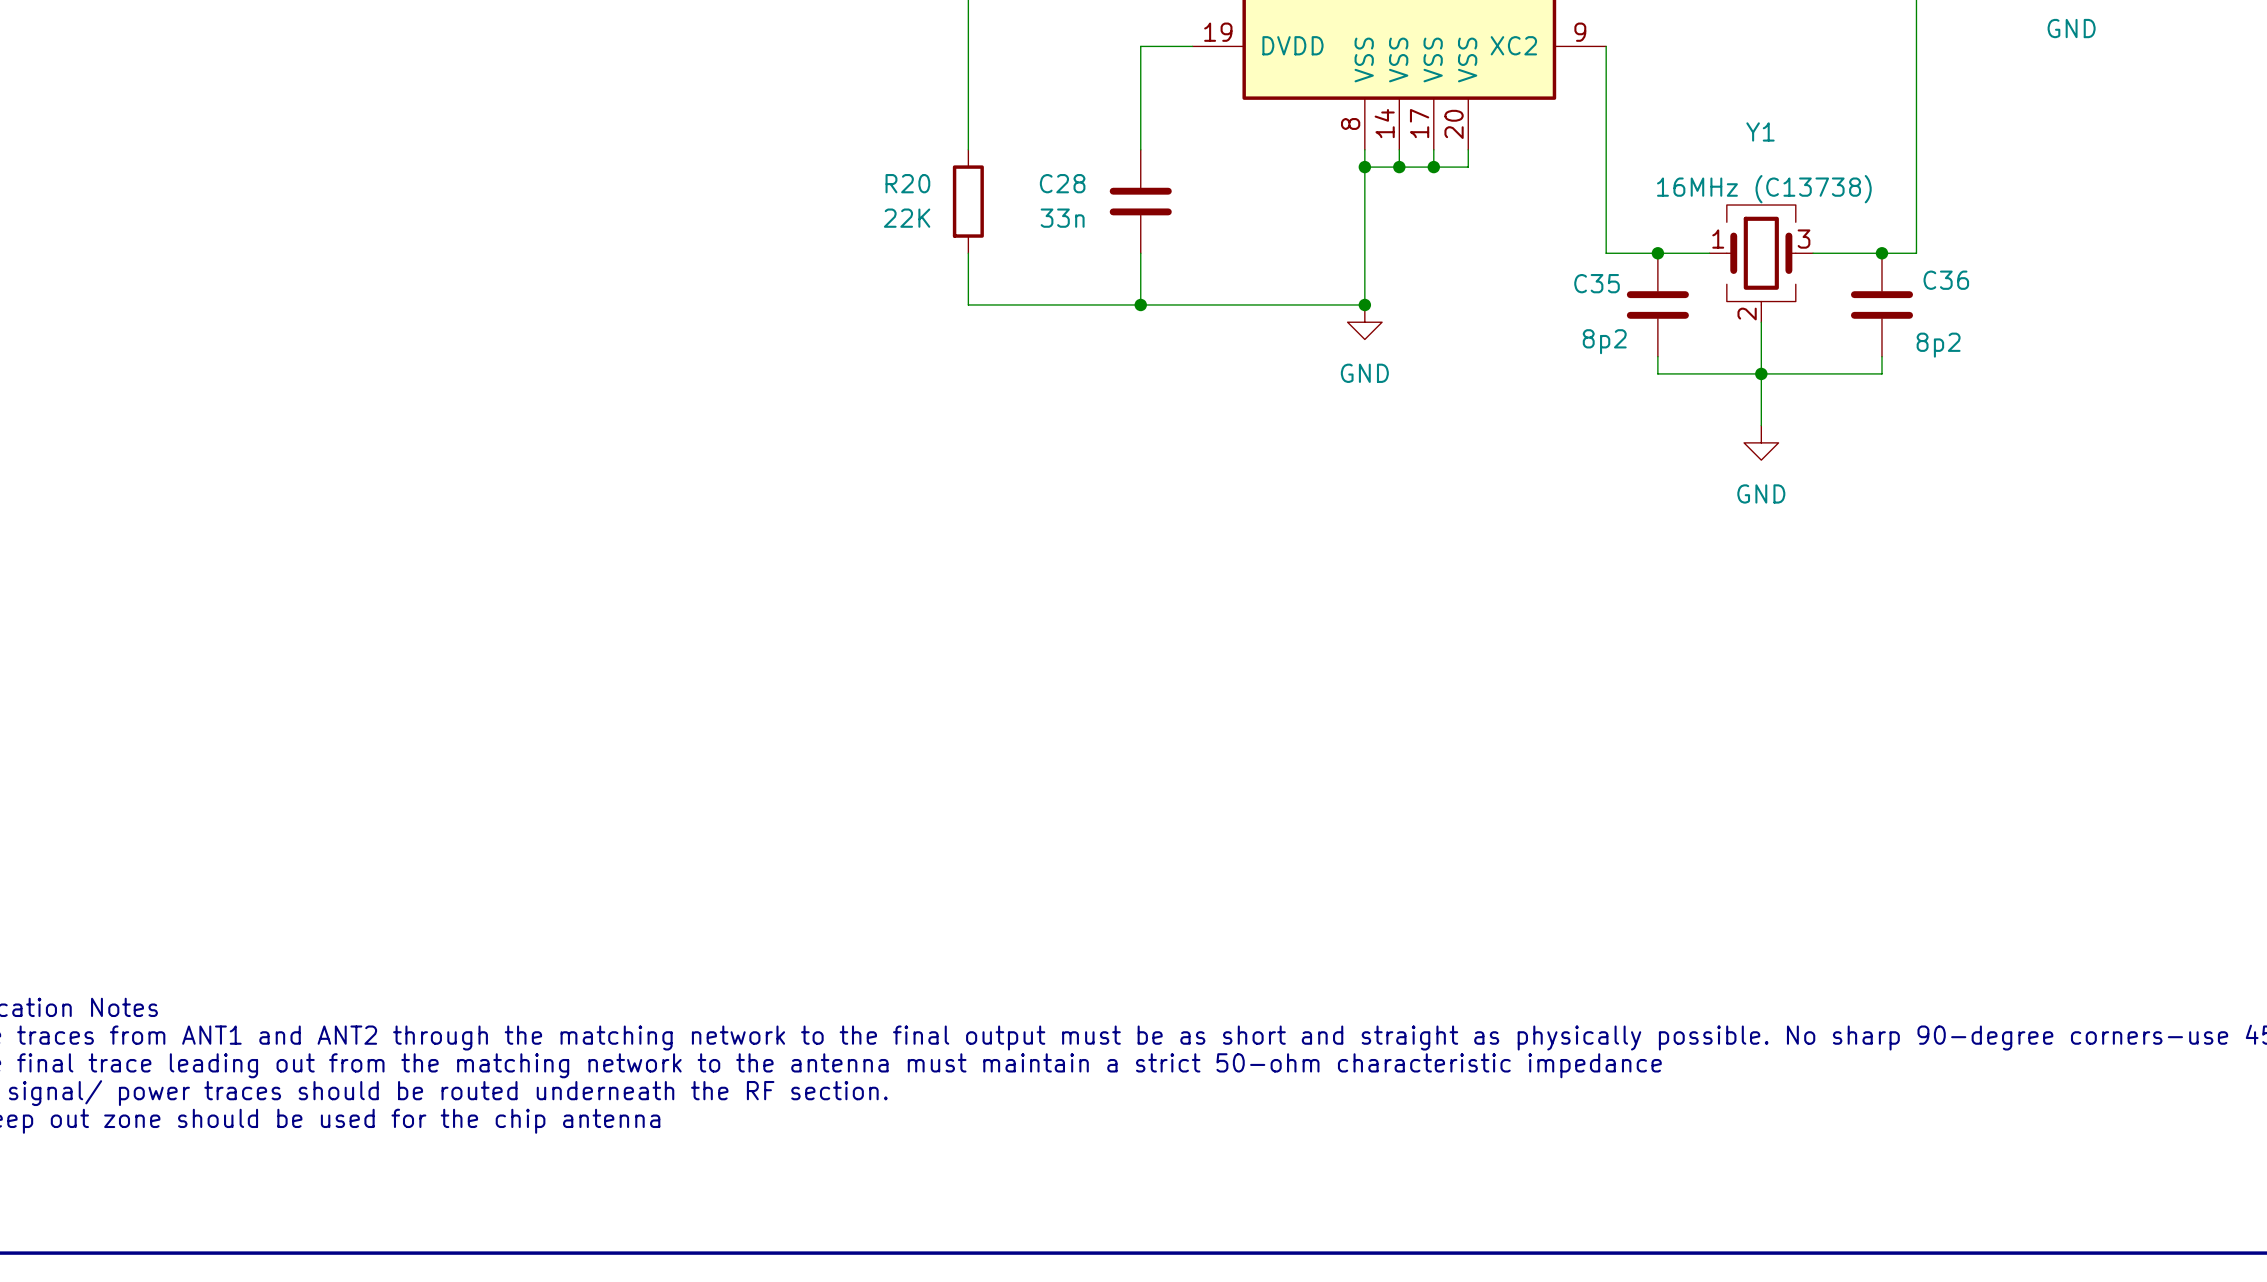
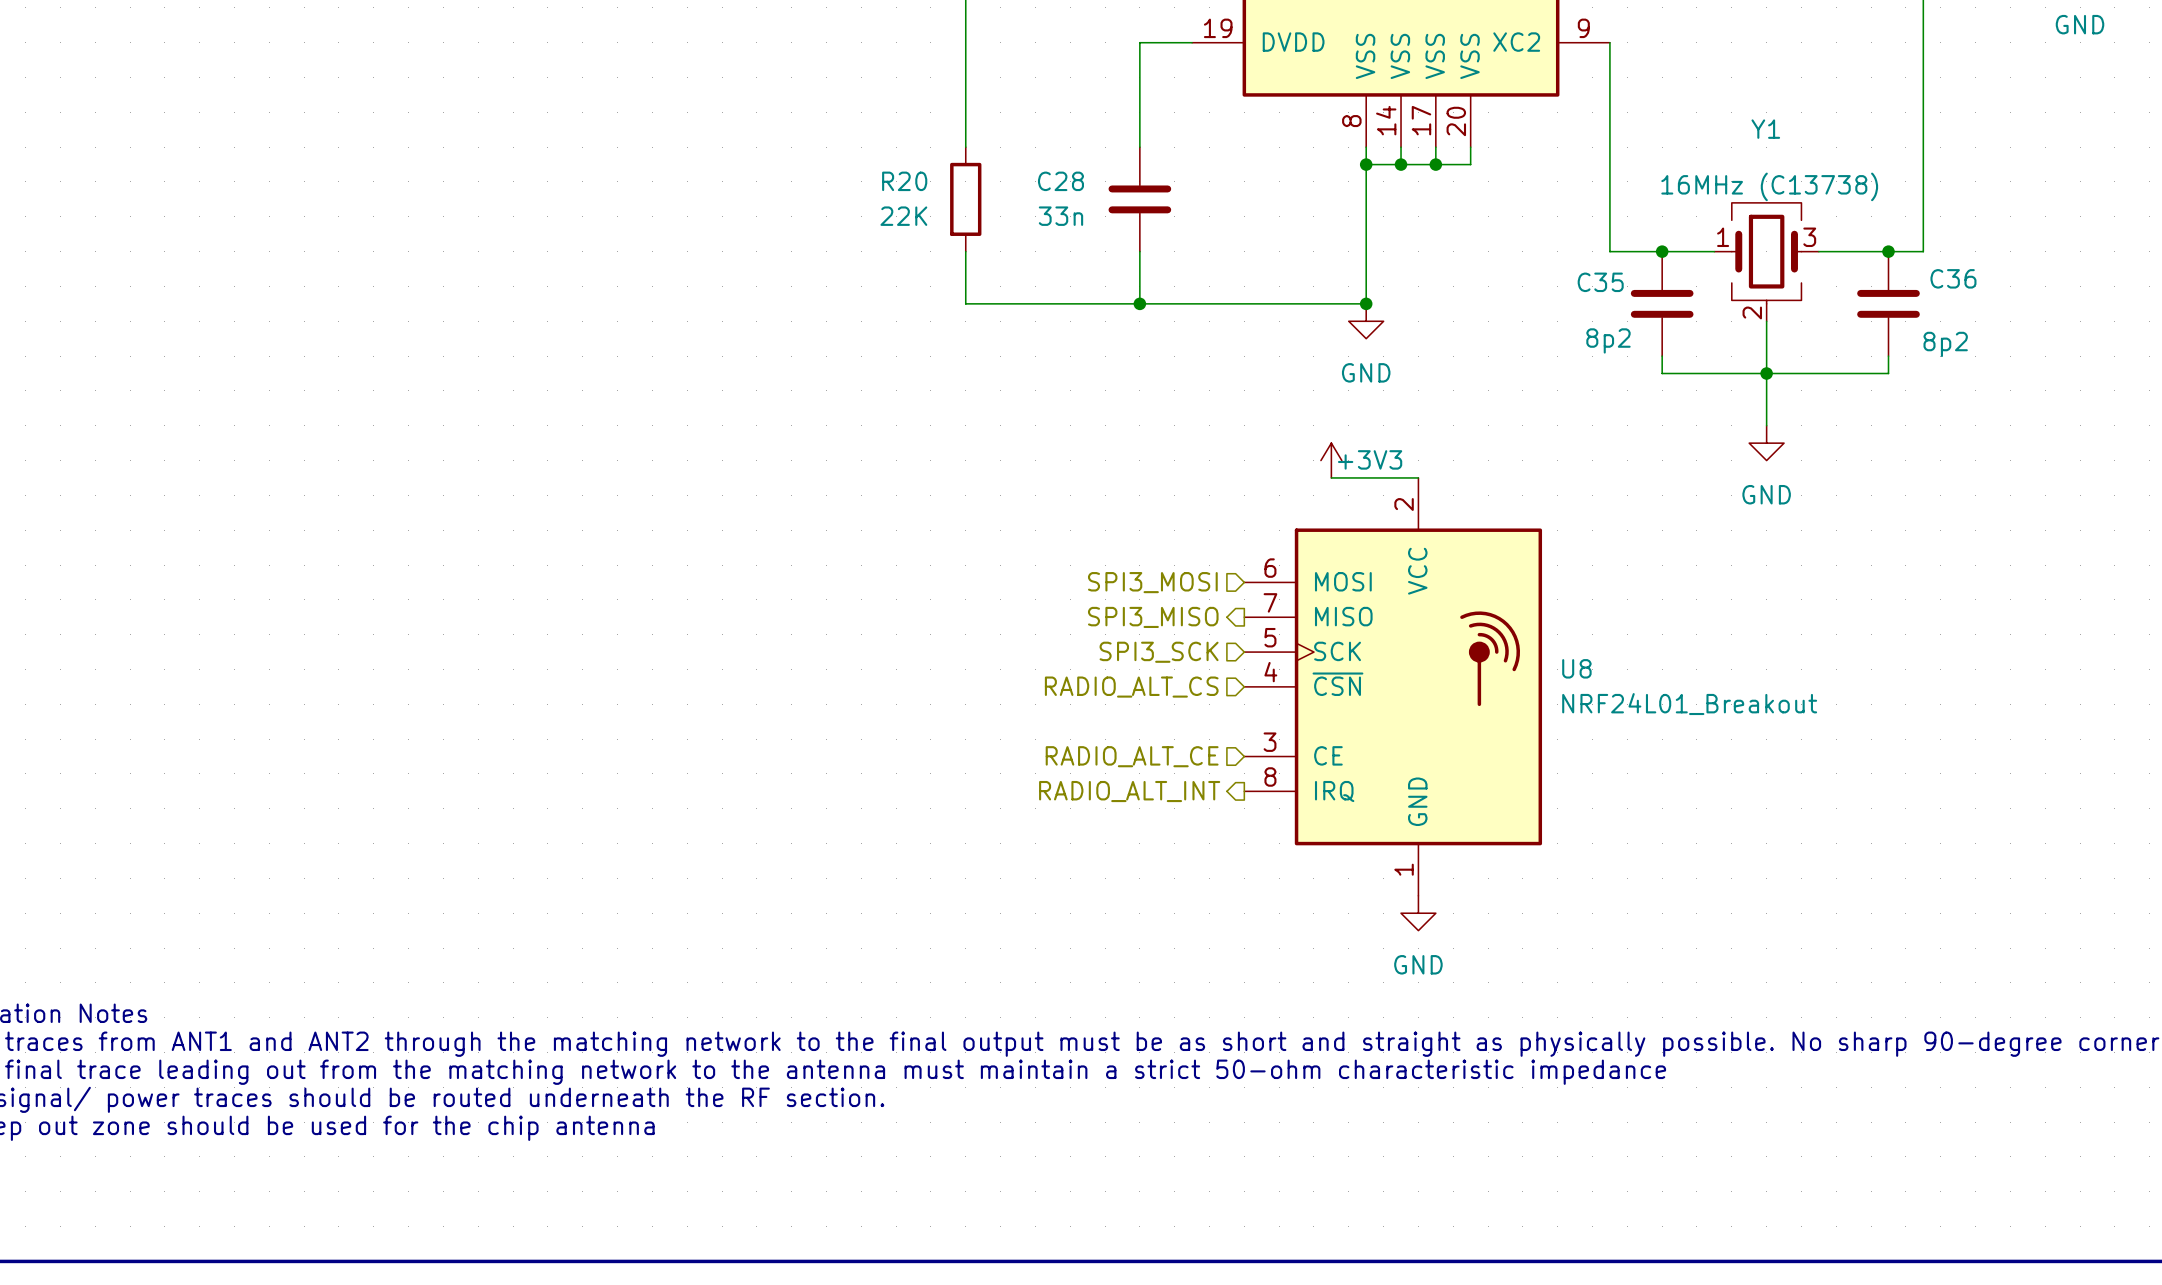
power symbol: none -> +3V3 (1331, 460)
wire: none -> (1331, 477) (1418, 477)
hierarchical label: none -> SPI3_MOSI (1152, 582)
hierarchical label: none -> SPI3_MISO (1153, 617)
hierarchical label: none -> SPI3_SCK (1159, 652)
hierarchical label: none -> RADIO_ALT_CS (1131, 687)
U8: none -> NRF24L01_Breakout (1393, 686)
hierarchical label: none -> RADIO_ALT_CE (1132, 756)
hierarchical label: none -> RADIO_ALT_INT (1129, 791)
power symbol: none -> GND (1418, 913)

